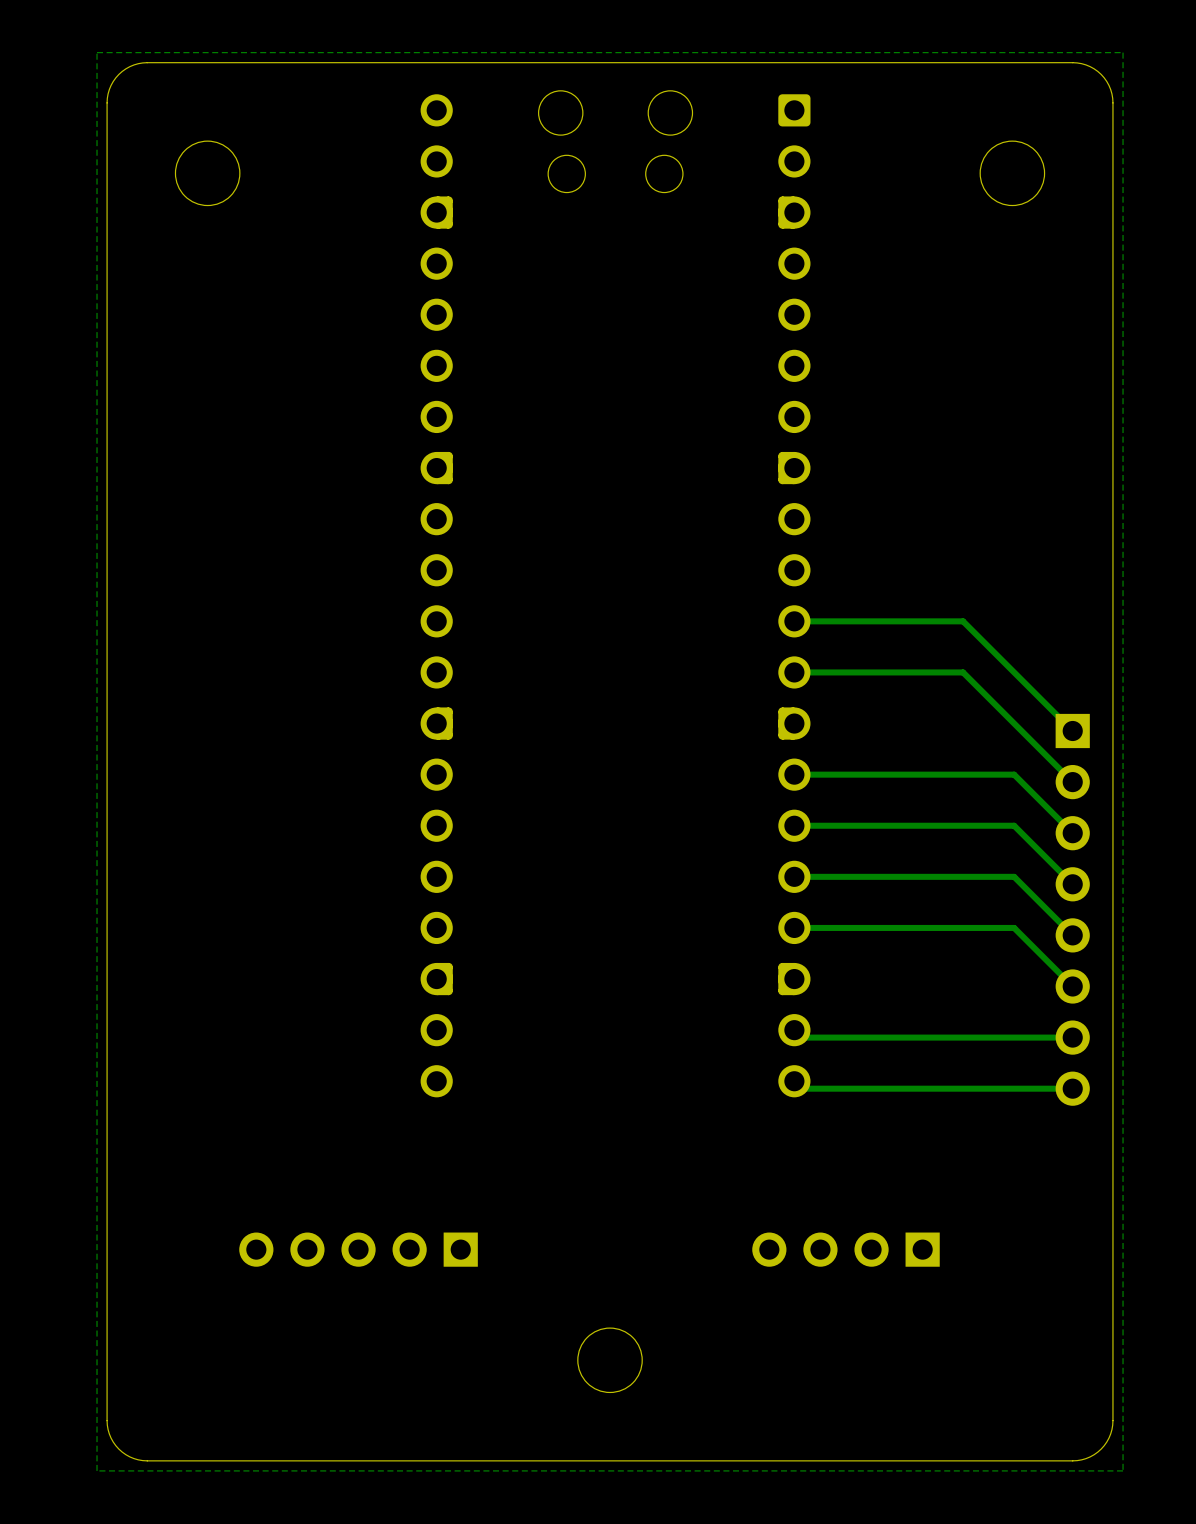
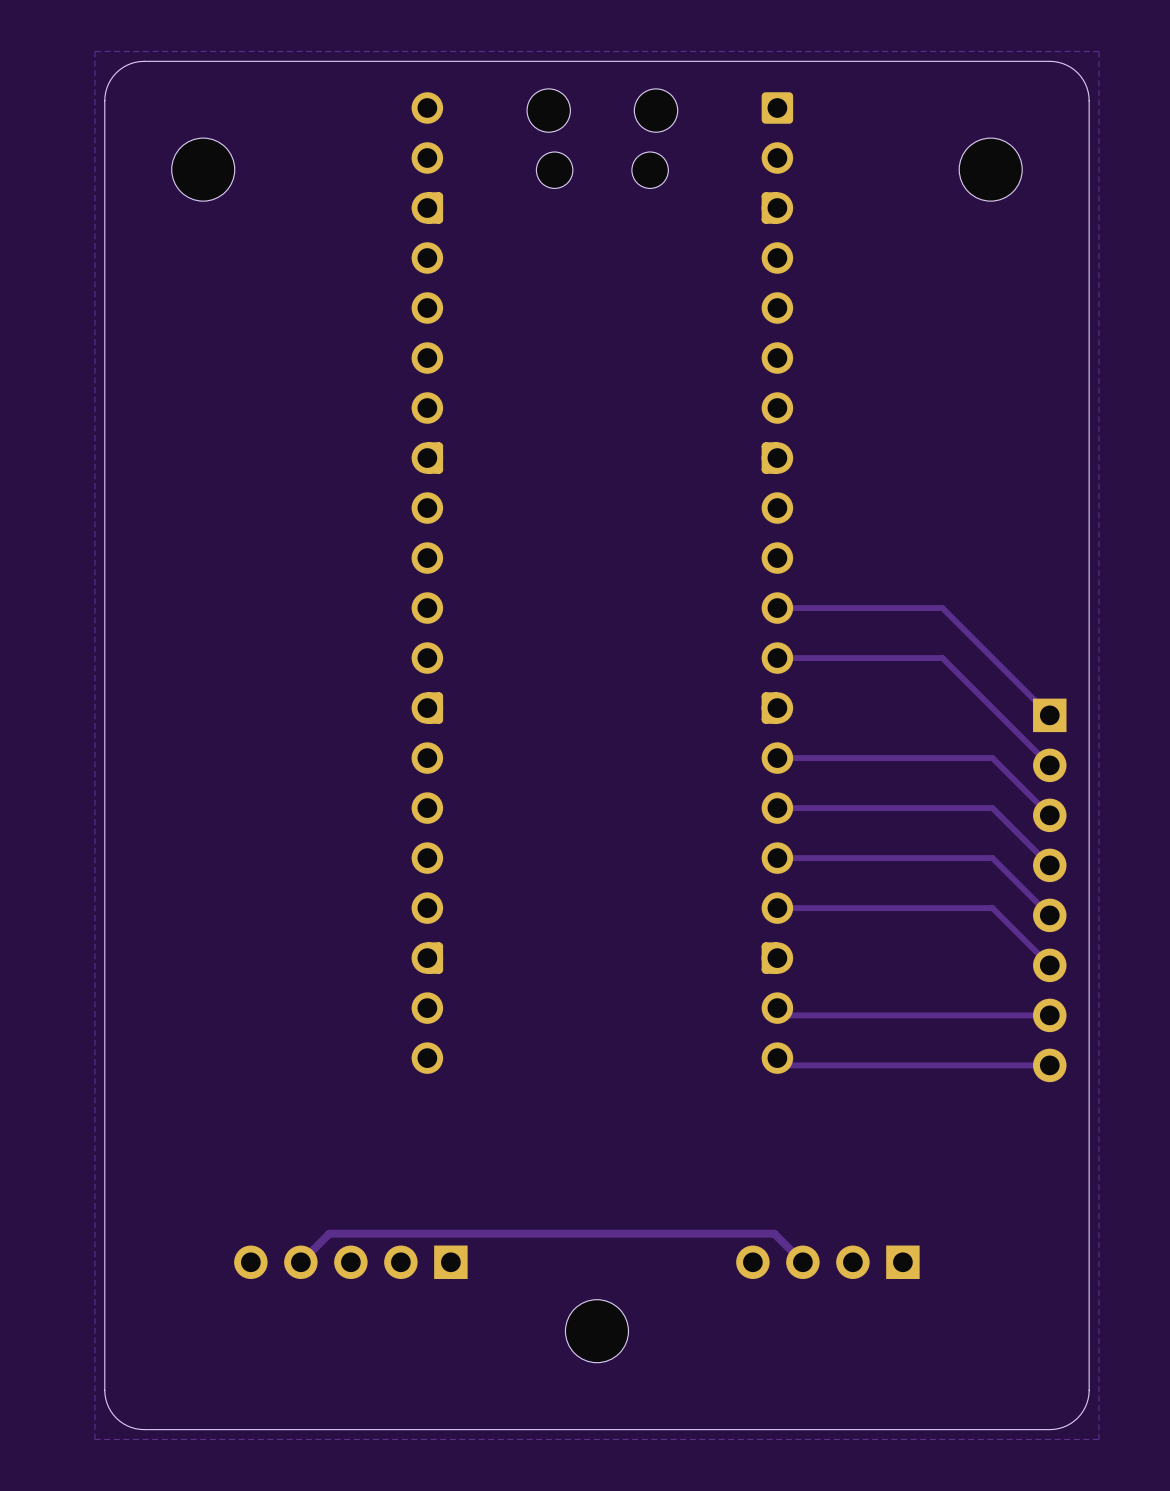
part position: (358, 1249) -> (350, 1262)
part position: (846, 1249) -> (827, 1262)
track: none -> (802, 1262) (774, 1233) (329, 1233) (300, 1262)

